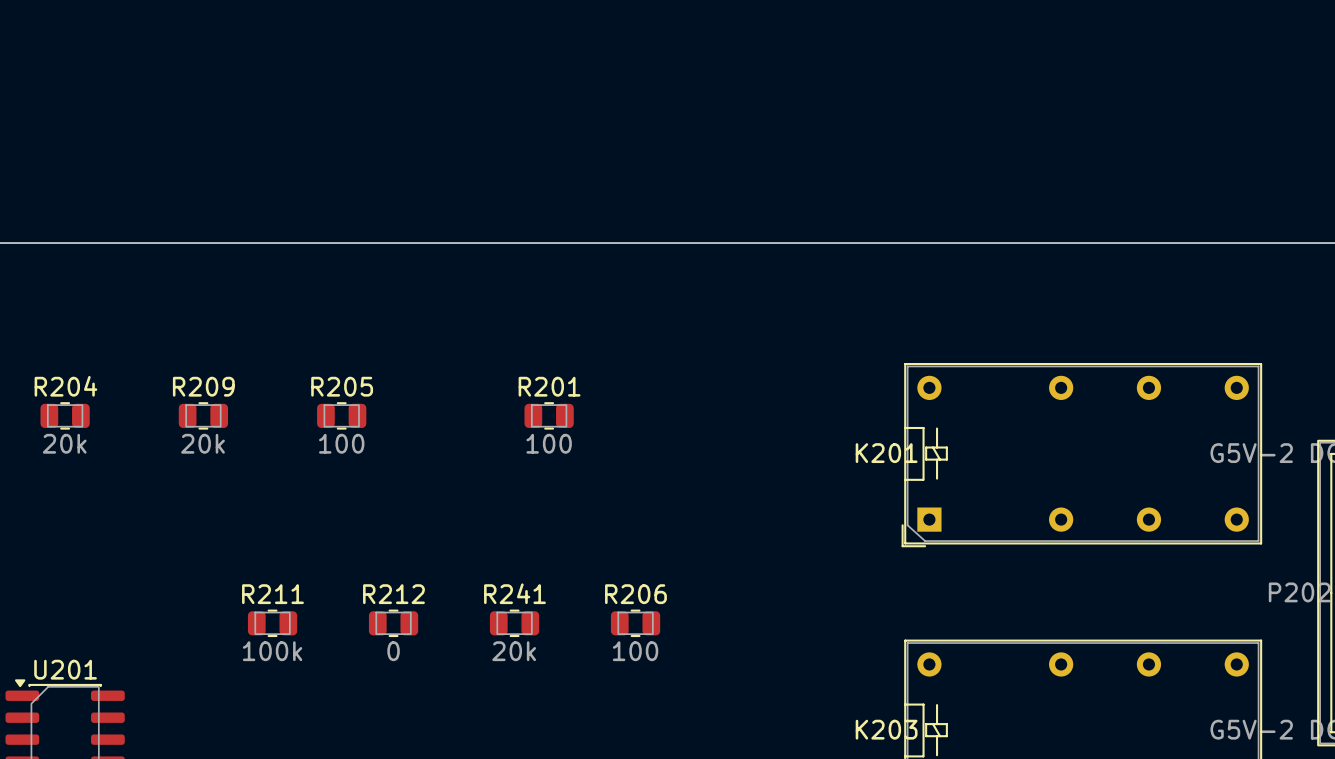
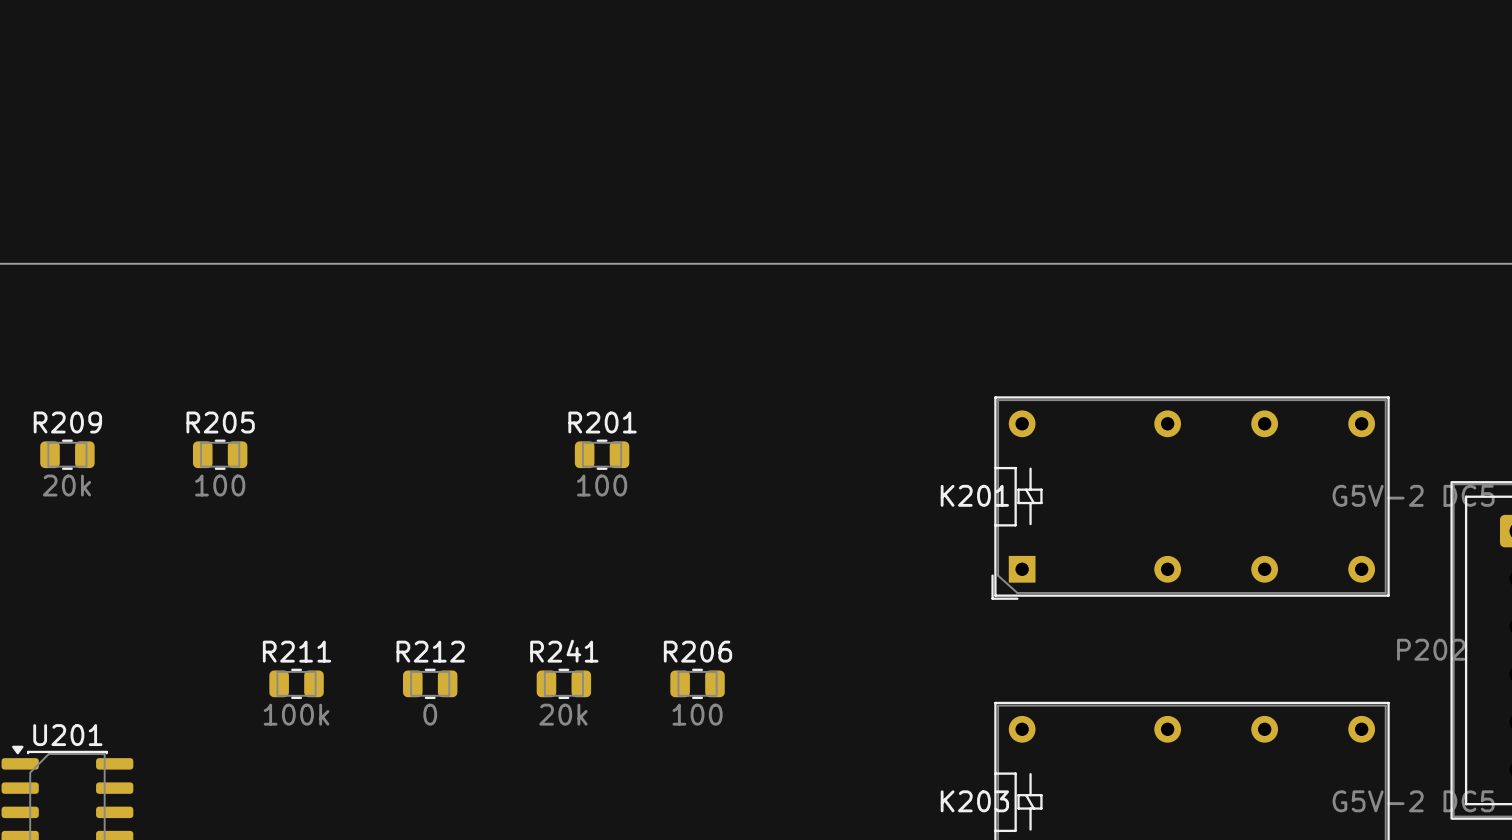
R204 name: R204 (65, 386) -> R209 (67, 422)
R209 name: R209 (203, 386) -> R205 (220, 422)
R205: 100 (341, 415) -> none
R209 value: 20k (203, 443) -> 100 (220, 485)

